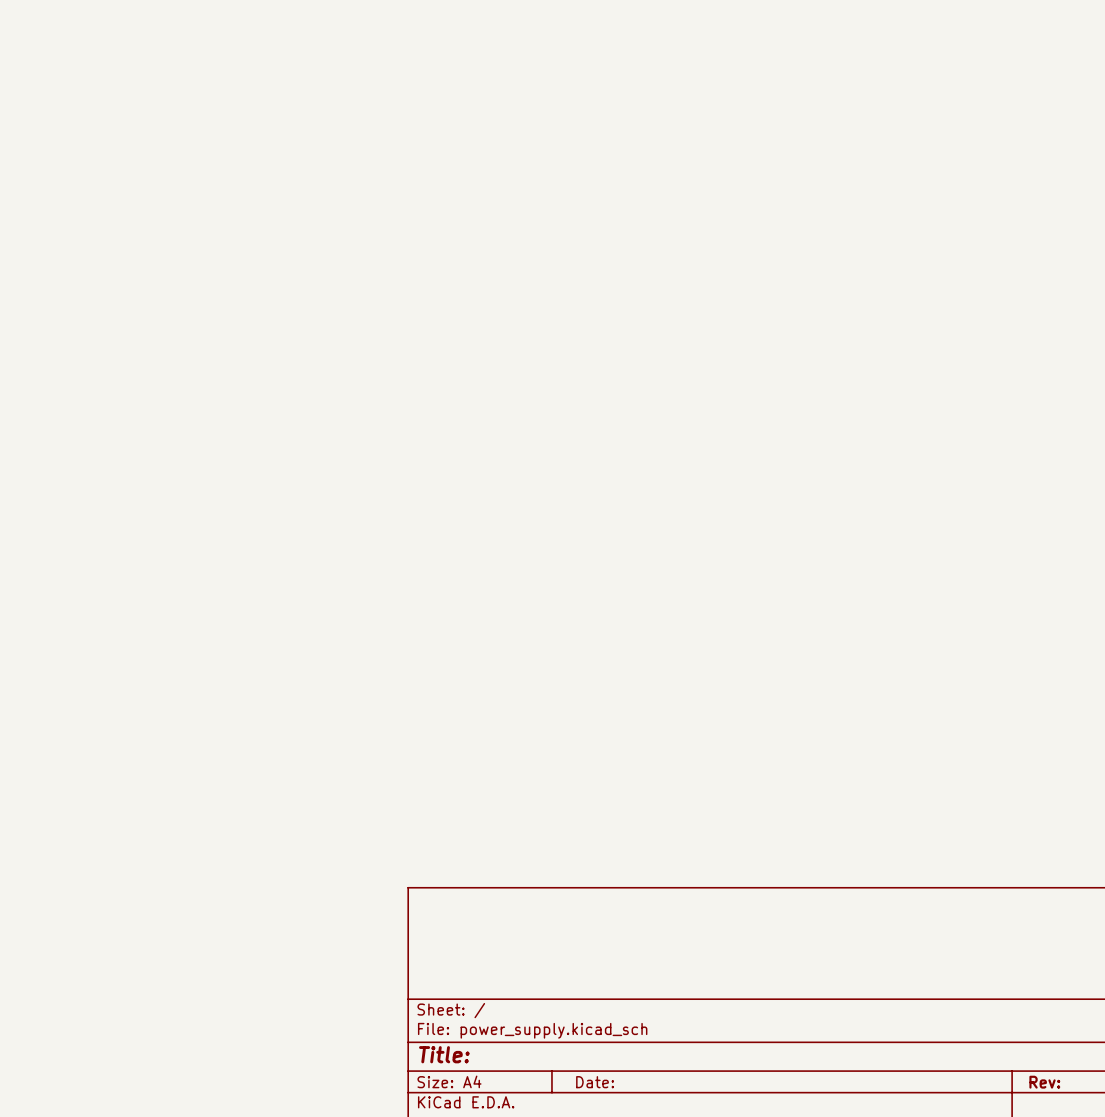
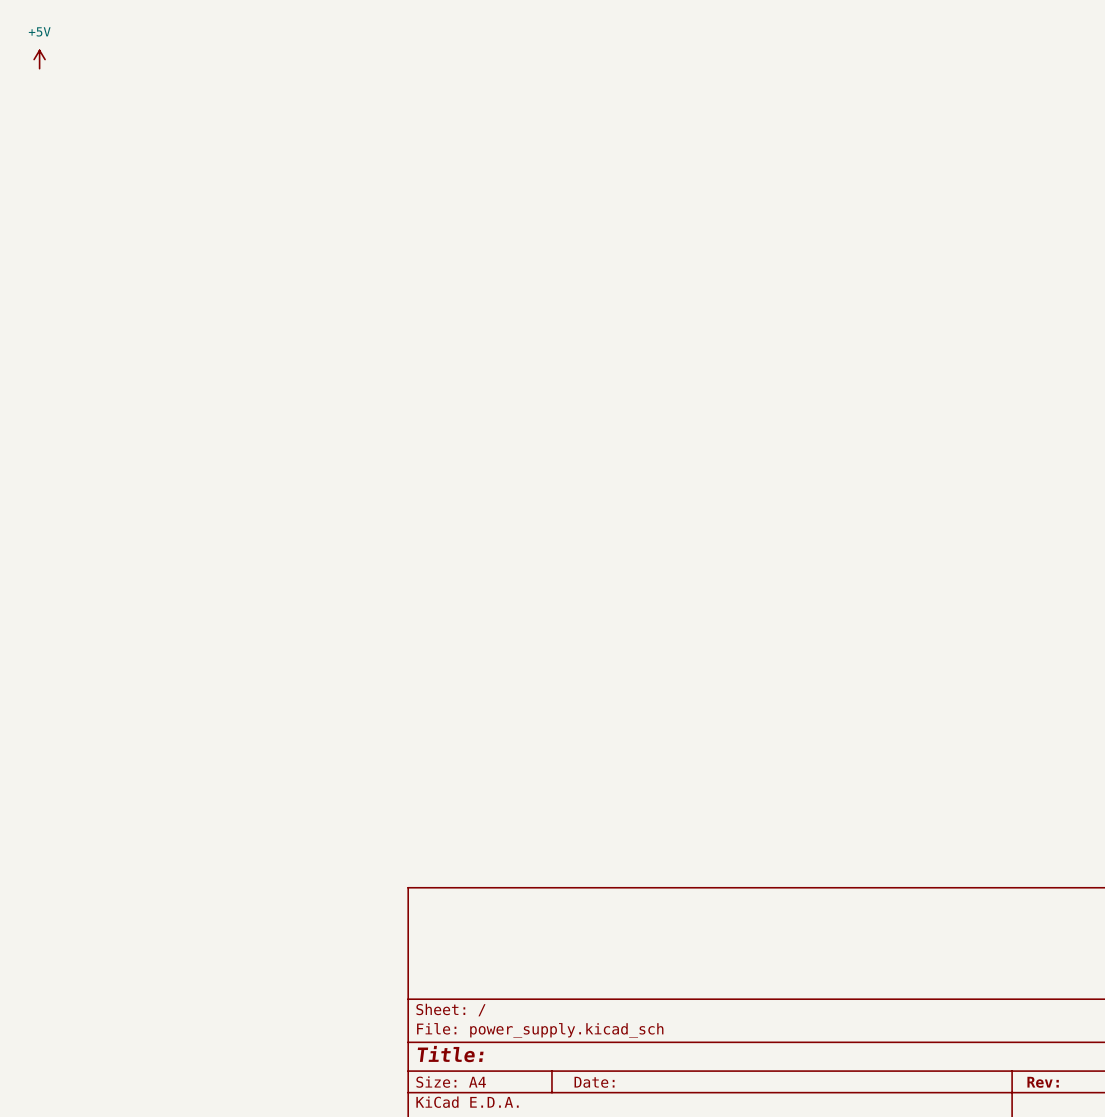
power symbol: none -> +5V (39, 59)

